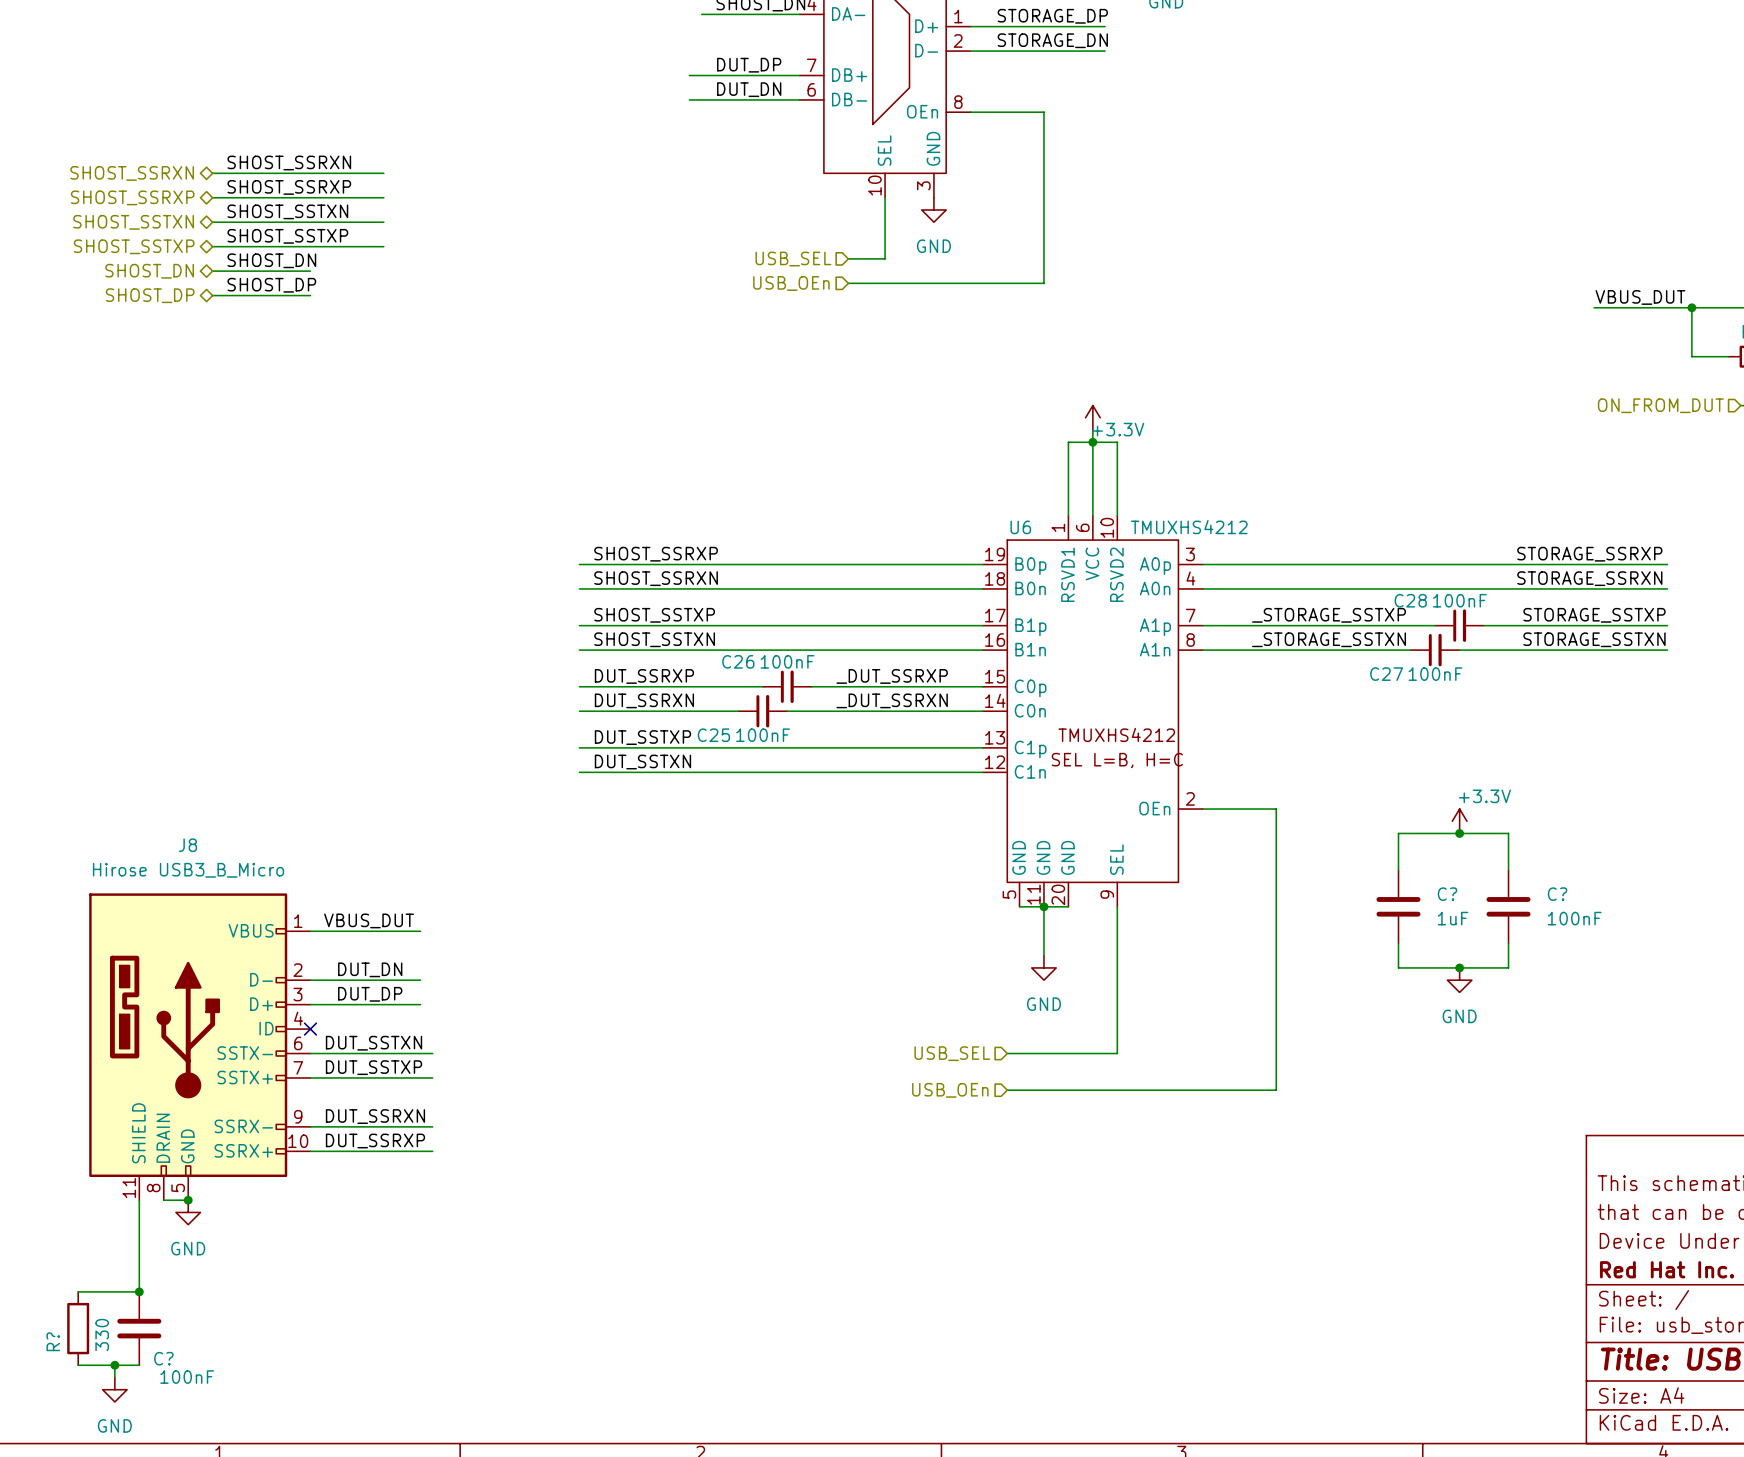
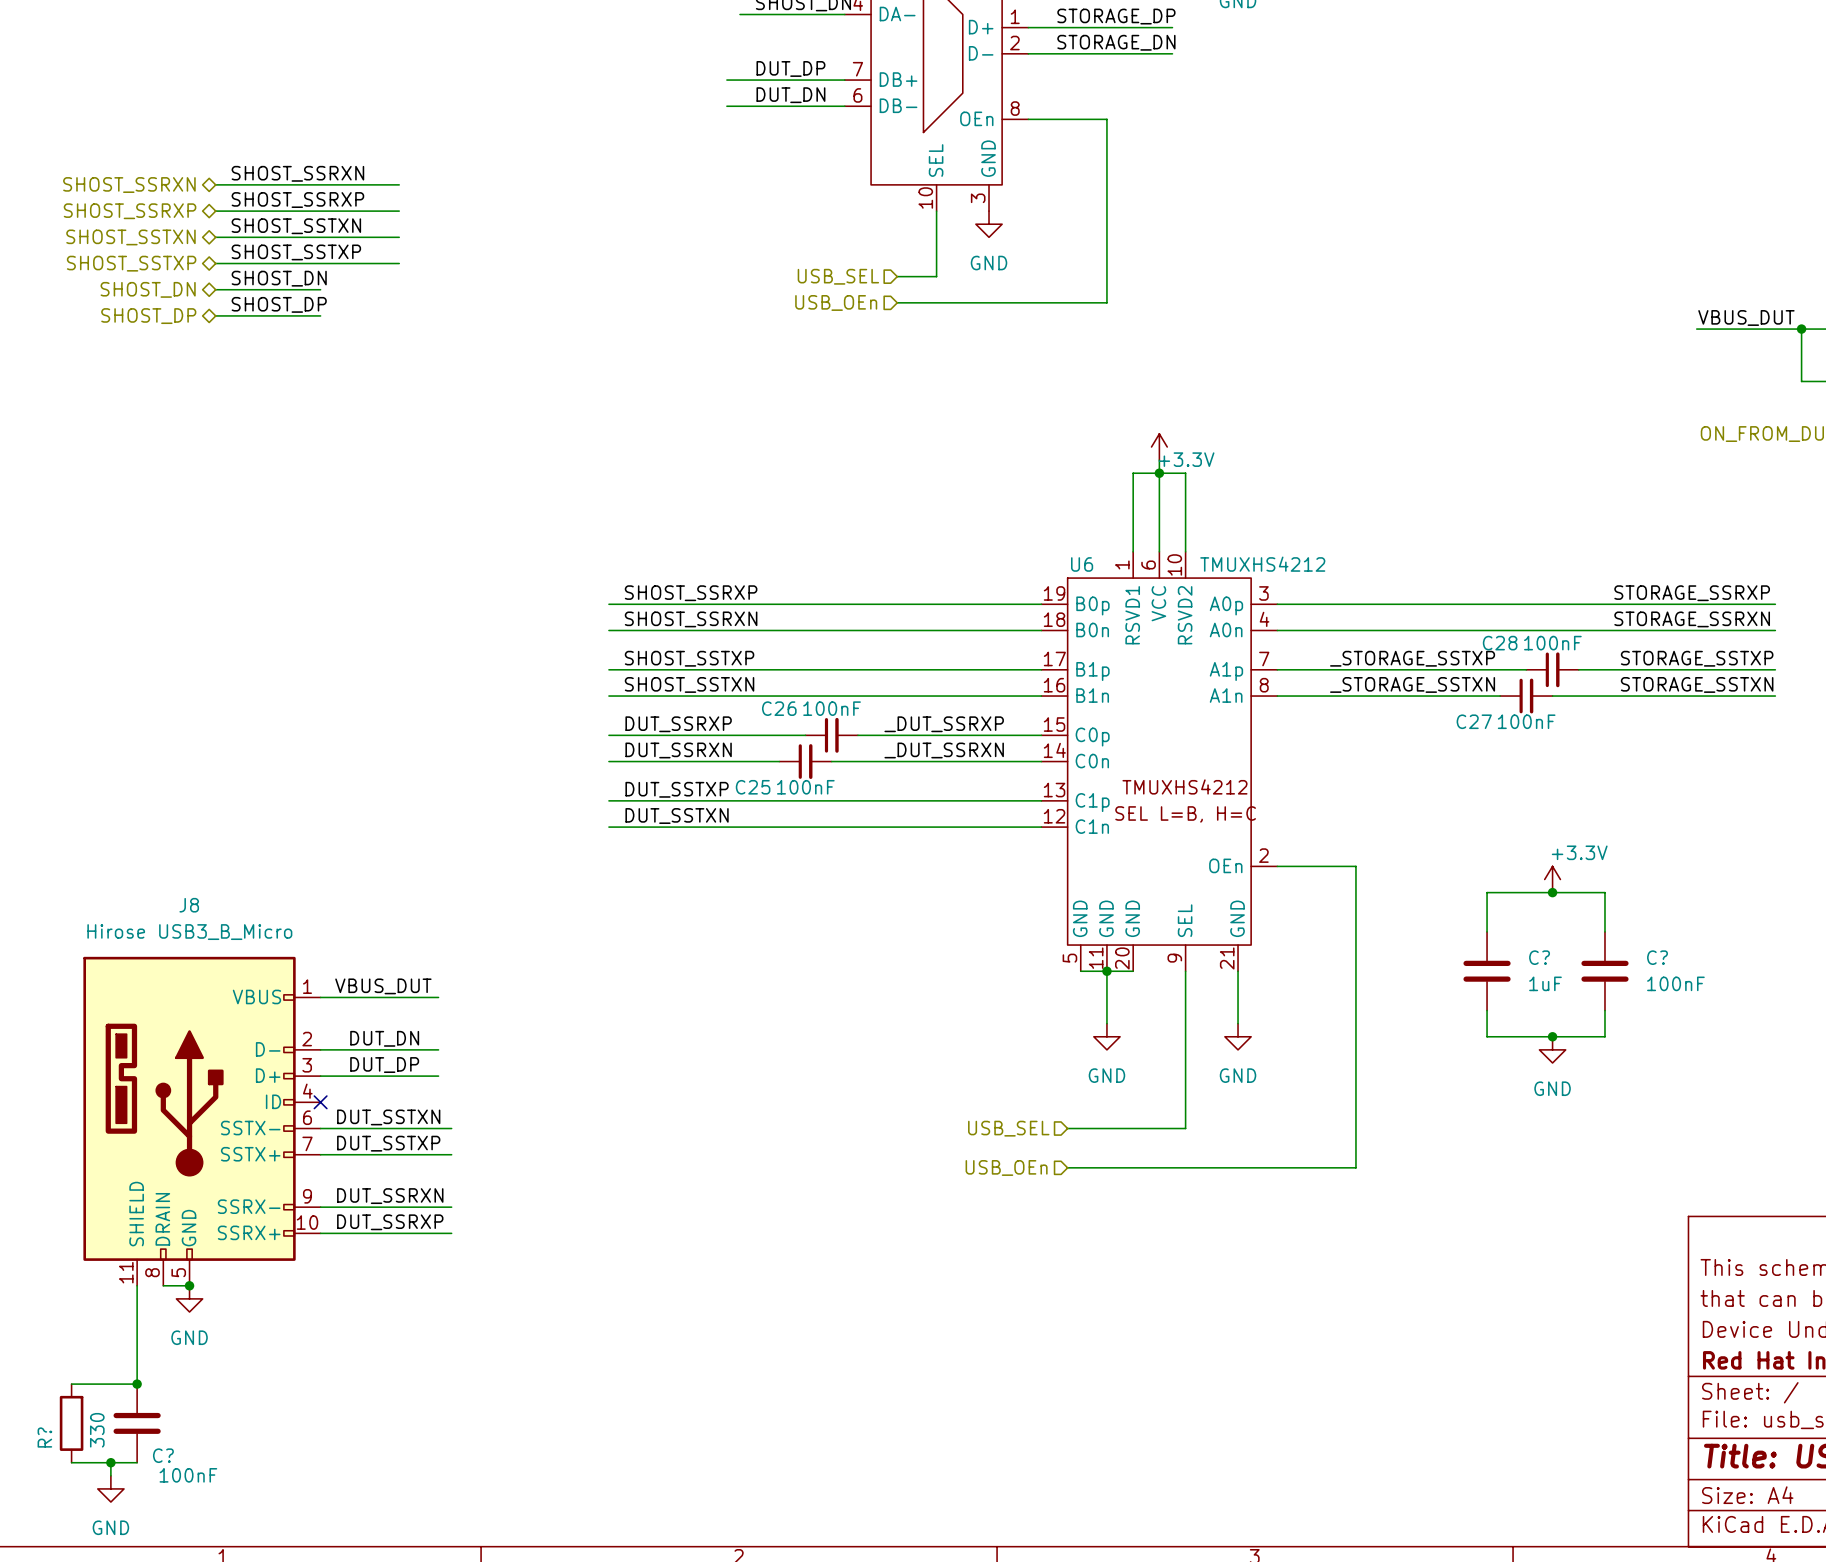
U6 symbol: [982, 515, 1203, 907] -> [1041, 551, 1278, 972]
wire: none -> (1238, 971) (1238, 1023)
power symbol: none -> GND (1238, 1036)

